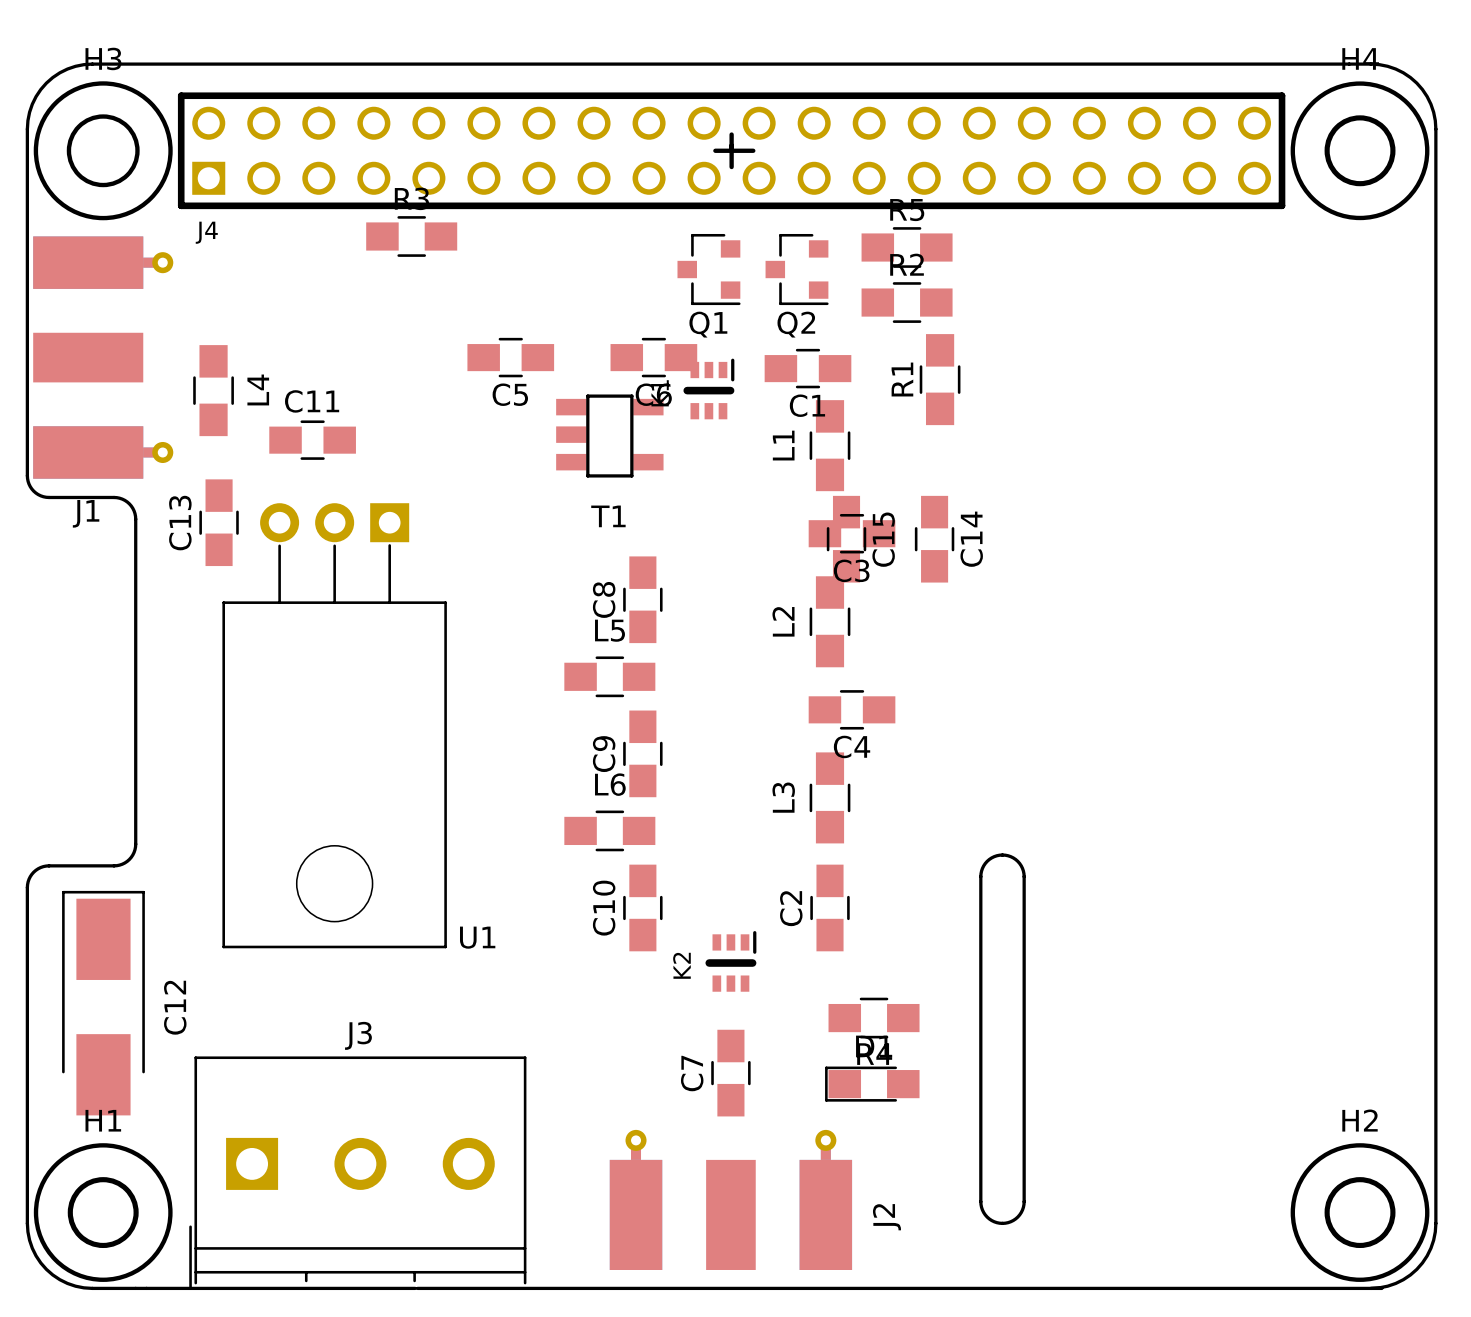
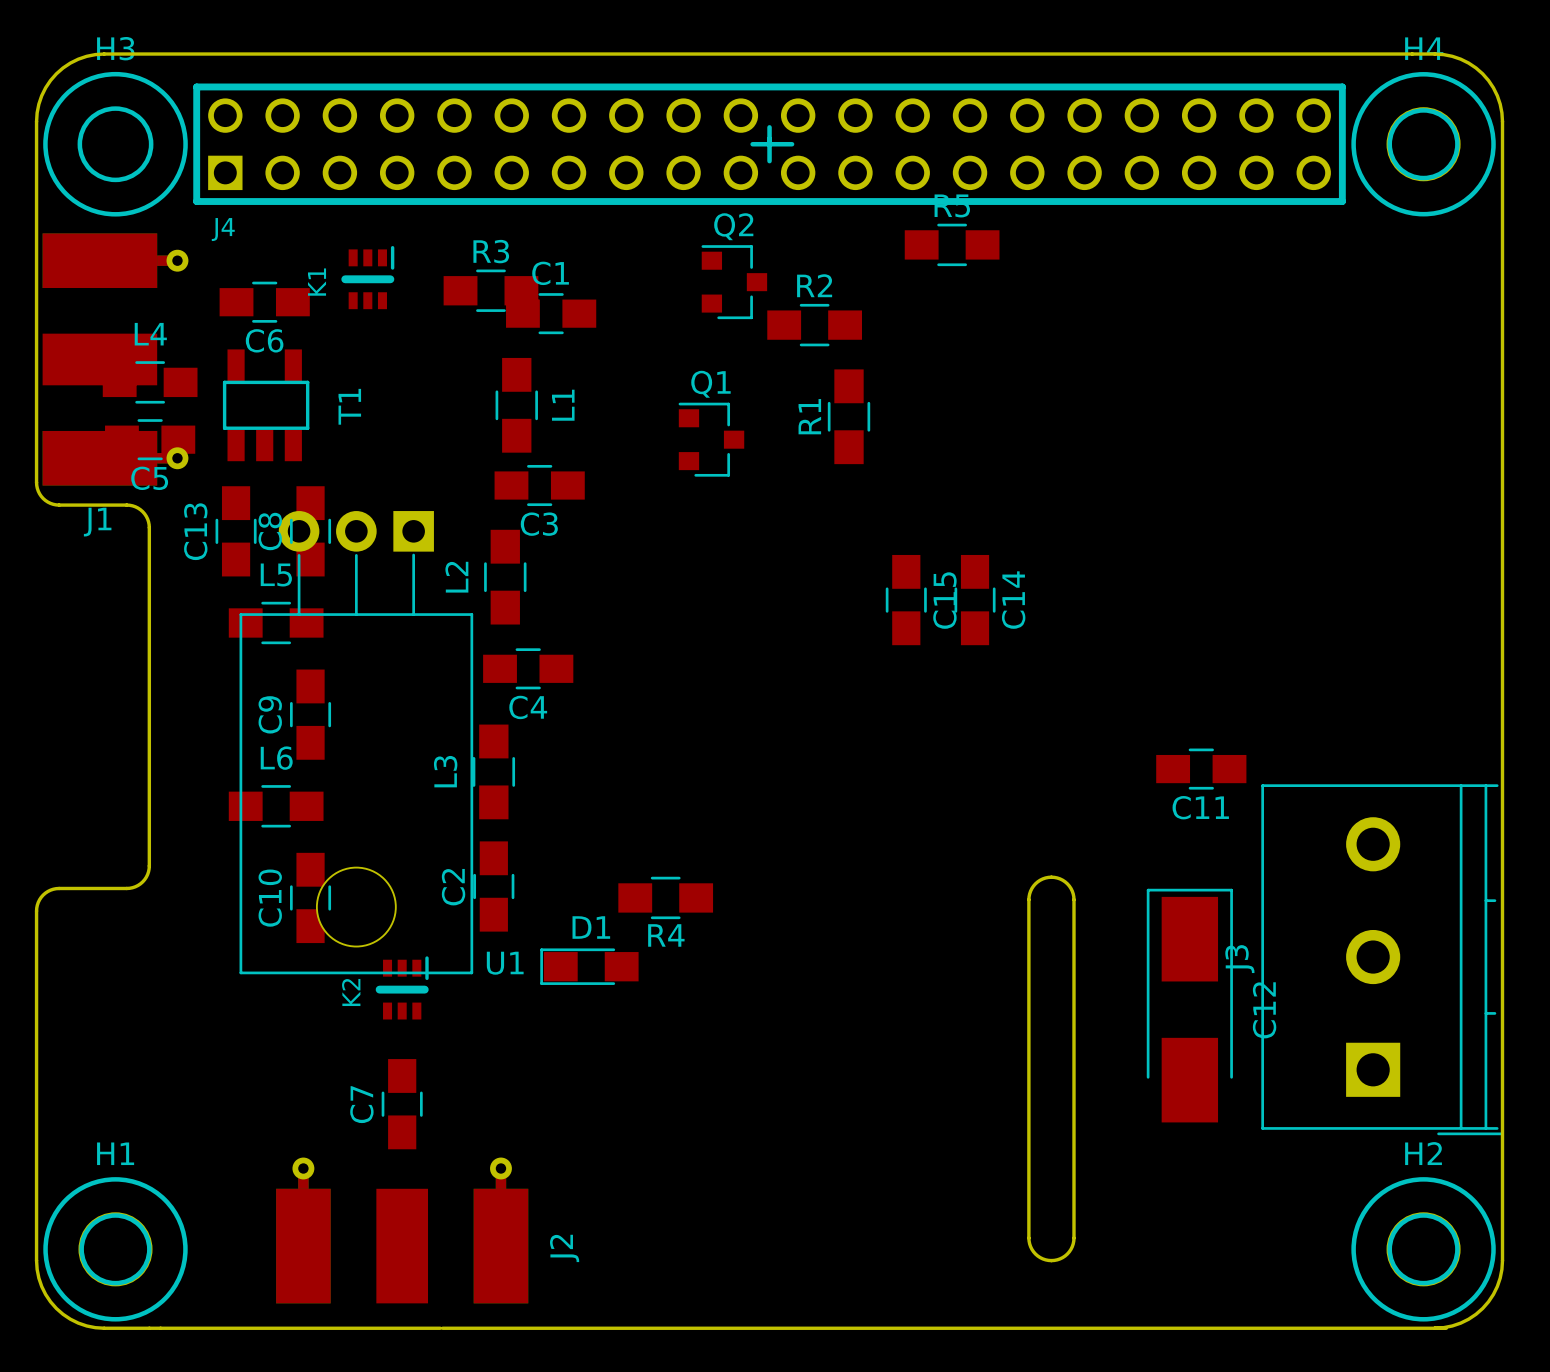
R3 position: (411, 236) -> (490, 290)
Q1 rotation: 0° (709, 269) -> 180° (711, 439)
Q1 position: (709, 269) -> (711, 439)
Q2 rotation: 0° (797, 269) -> 180° (734, 282)
Q2 position: (797, 269) -> (734, 282)
R2 position: (907, 302) -> (814, 325)
C5 position: (510, 357) -> (150, 439)
C6 position: (653, 357) -> (264, 302)
C1 position: (807, 368) -> (551, 313)
R1 position: (940, 379) -> (849, 416)
K1 position: (708, 388) -> (367, 277)
L4 name position: L4 (258, 389) -> L4 (150, 334)
L4 rotation: 0° (213, 390) -> 90° clockwise (150, 382)
L4 position: (213, 390) -> (150, 382)
C11 name position: C11 (312, 401) -> C11 (1200, 807)
C1 name position: C1 (807, 405) -> C1 (550, 273)
T1 rotation: 0° (609, 436) -> 90° counterclockwise (266, 405)
T1 position: (609, 436) -> (266, 405)
C11 position: (312, 440) -> (1201, 769)
L1 name position: L1 (783, 445) -> L1 (563, 405)
L1 position: (830, 445) -> (516, 405)
C3 position: (852, 533) -> (539, 485)
C15 position: (846, 539) -> (906, 600)
C14 position: (934, 539) -> (975, 600)
C8 position: (642, 599) -> (310, 531)
L2 position: (830, 621) -> (505, 577)
L5 position: (609, 676) -> (276, 622)
C4 position: (852, 709) -> (528, 668)
C9 position: (642, 753) -> (310, 714)
L3 position: (830, 797) -> (493, 771)
L6 position: (609, 830) -> (276, 806)
C10 position: (642, 907) -> (310, 897)
C2 position: (830, 907) -> (493, 886)
K2 position: (730, 961) -> (402, 987)
C12 position: (103, 1003) -> (1189, 1005)
R4 position: (874, 1018) -> (665, 897)
C7 position: (730, 1073) -> (402, 1104)
D1 position: (872, 1084) -> (589, 966)
J3 rotation: 0° (357, 1173) -> 90° counterclockwise (1382, 959)
J3 position: (357, 1173) -> (1382, 959)
J2 position: (730, 1199) -> (402, 1230)

